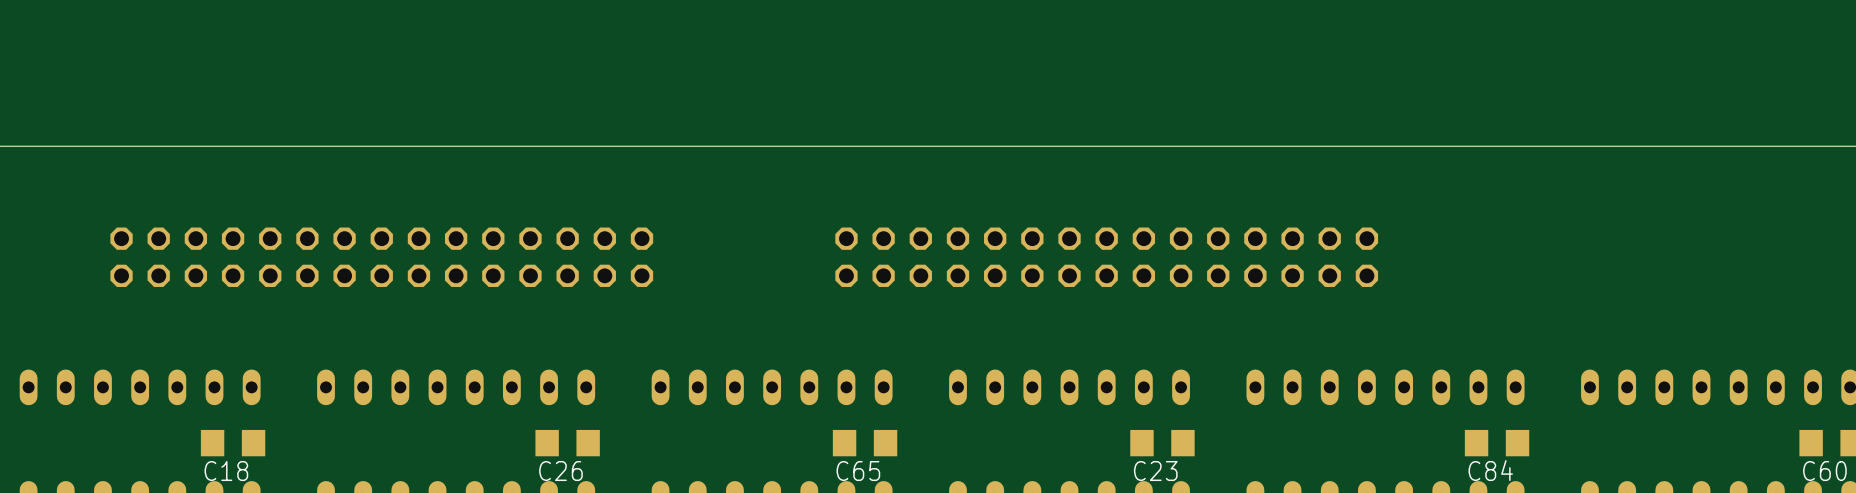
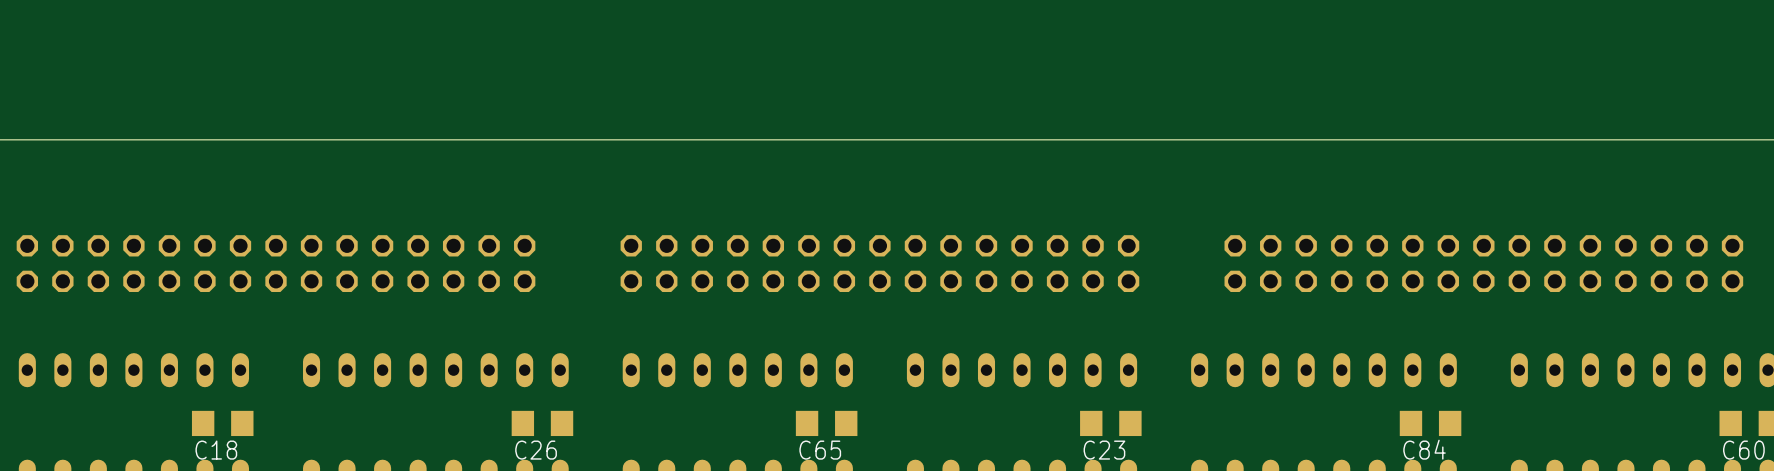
part position: (381, 257) -> (276, 263)
part position: (1106, 257) -> (879, 263)
part: none -> (1483, 263)

